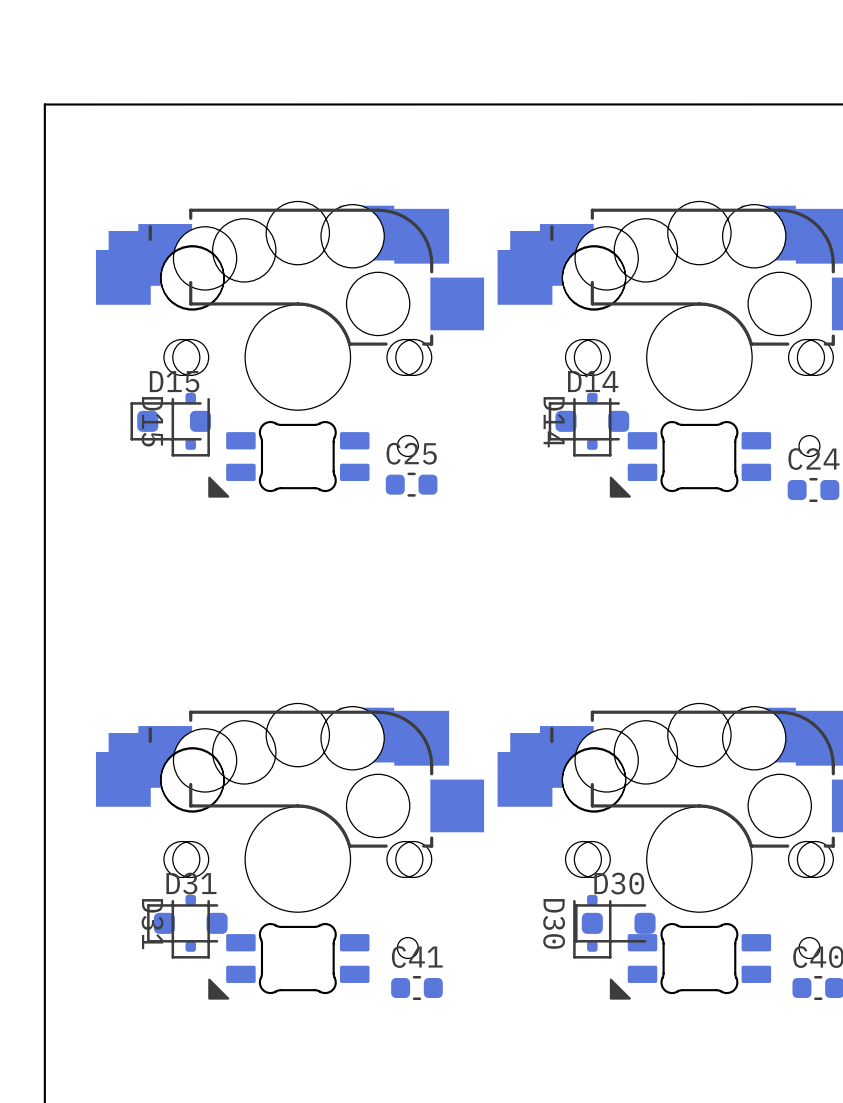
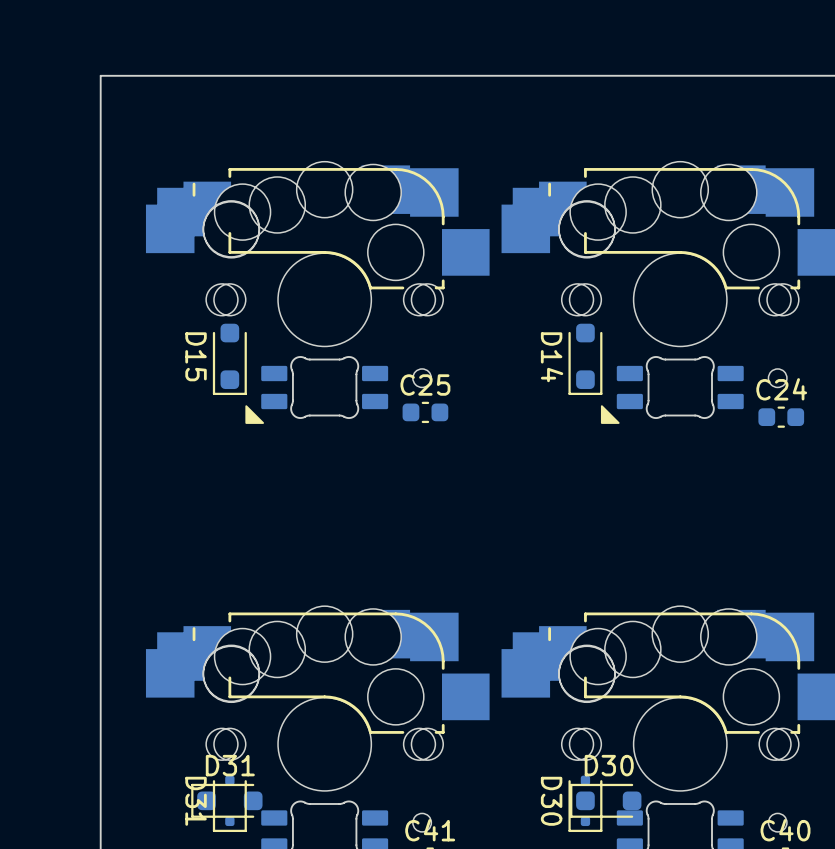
D15 footprint: [171, 392, 210, 457] -> [212, 323, 247, 396]
D14 footprint: [573, 392, 612, 457] -> [568, 323, 603, 396]
D15: (170, 421) -> none
D14: (588, 421) -> none

